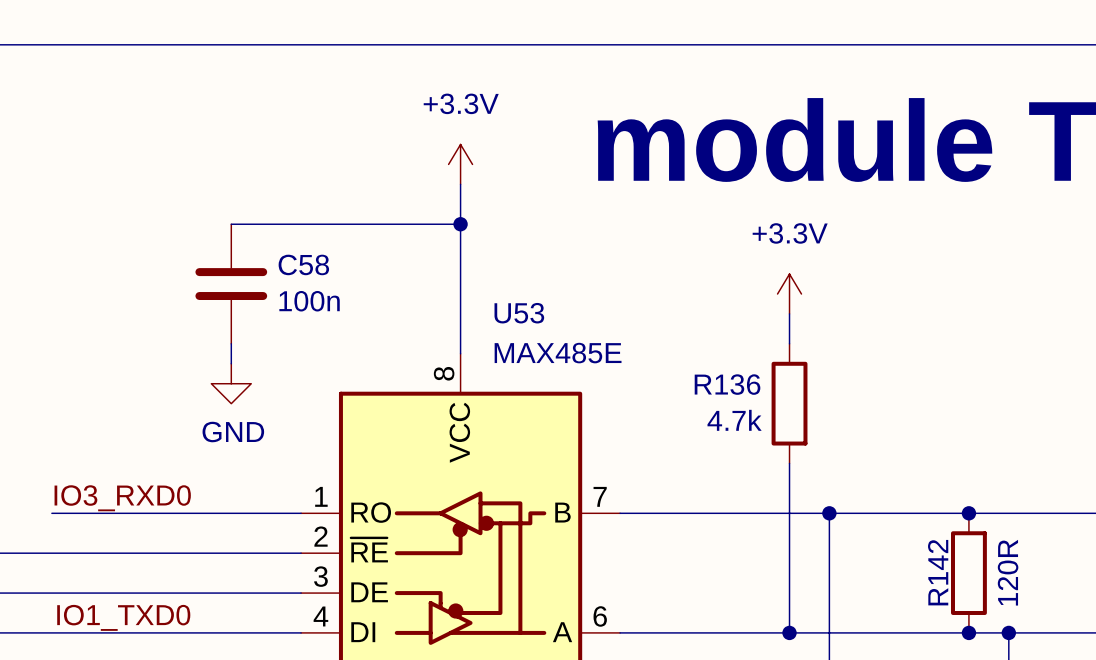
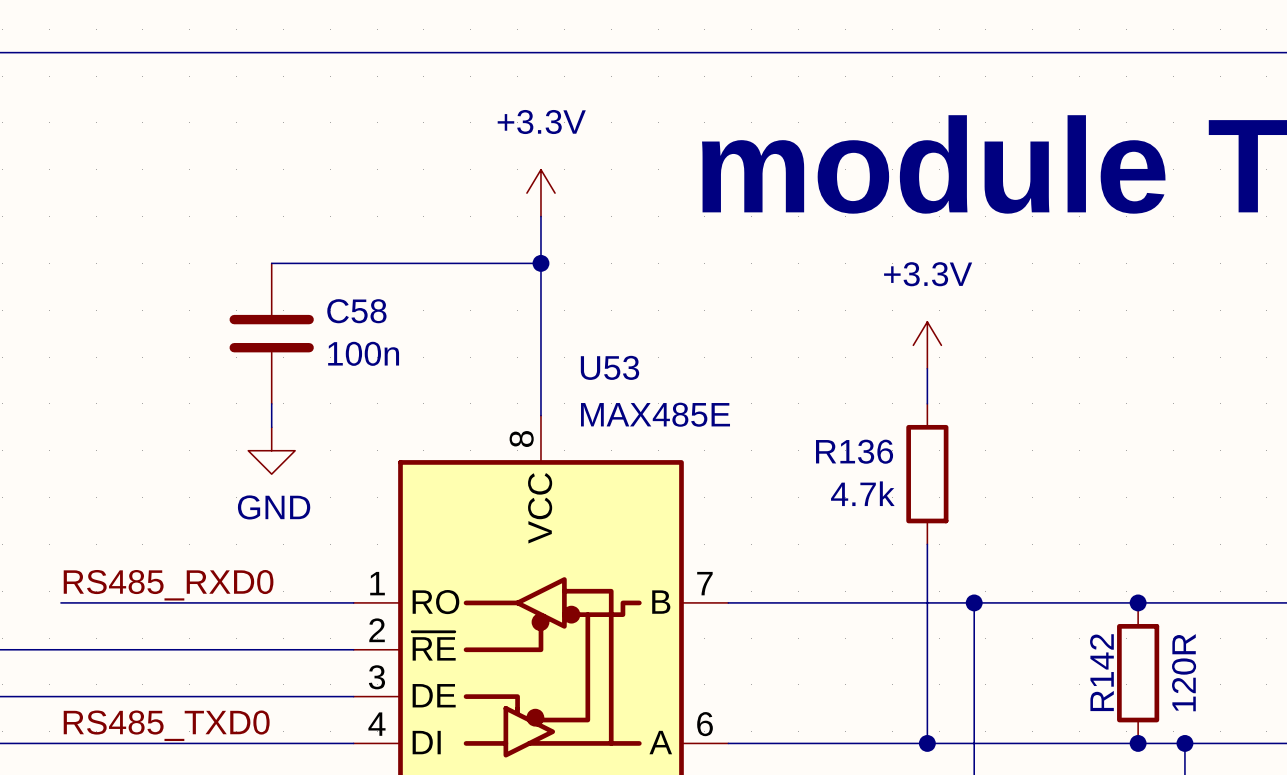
label: IO3_RXD0 (122, 498) -> RS485_RXD0 (168, 585)
label: IO1_TXD0 (123, 617) -> none
label: none -> RS485_TXD0 (166, 725)

